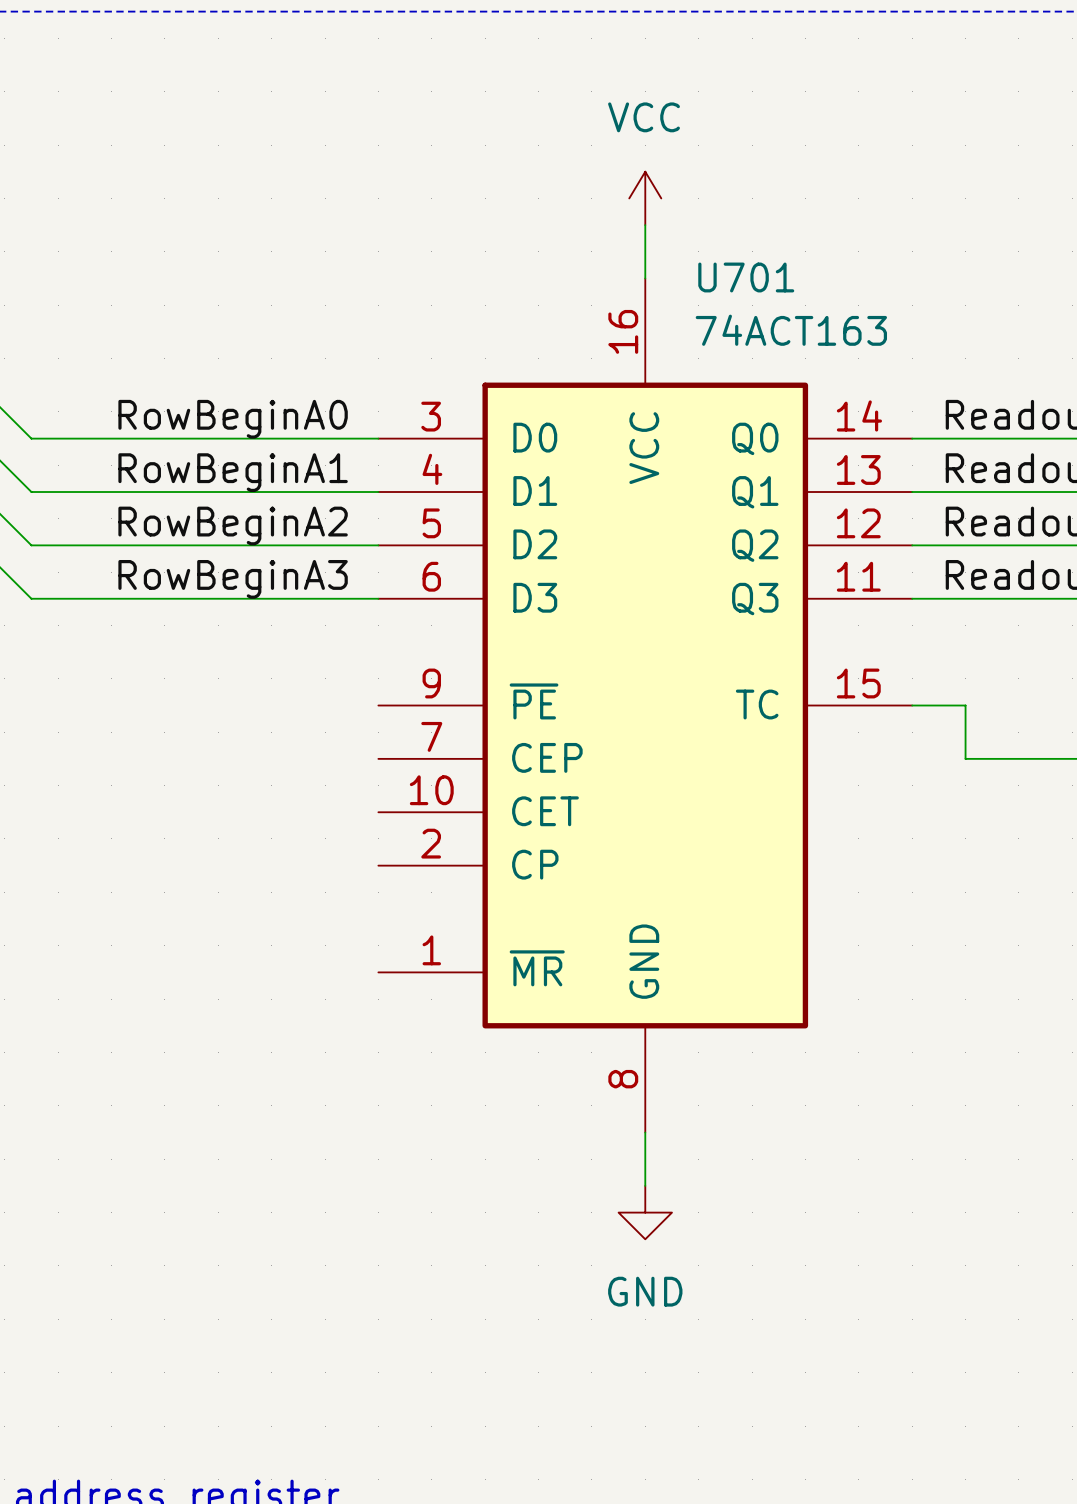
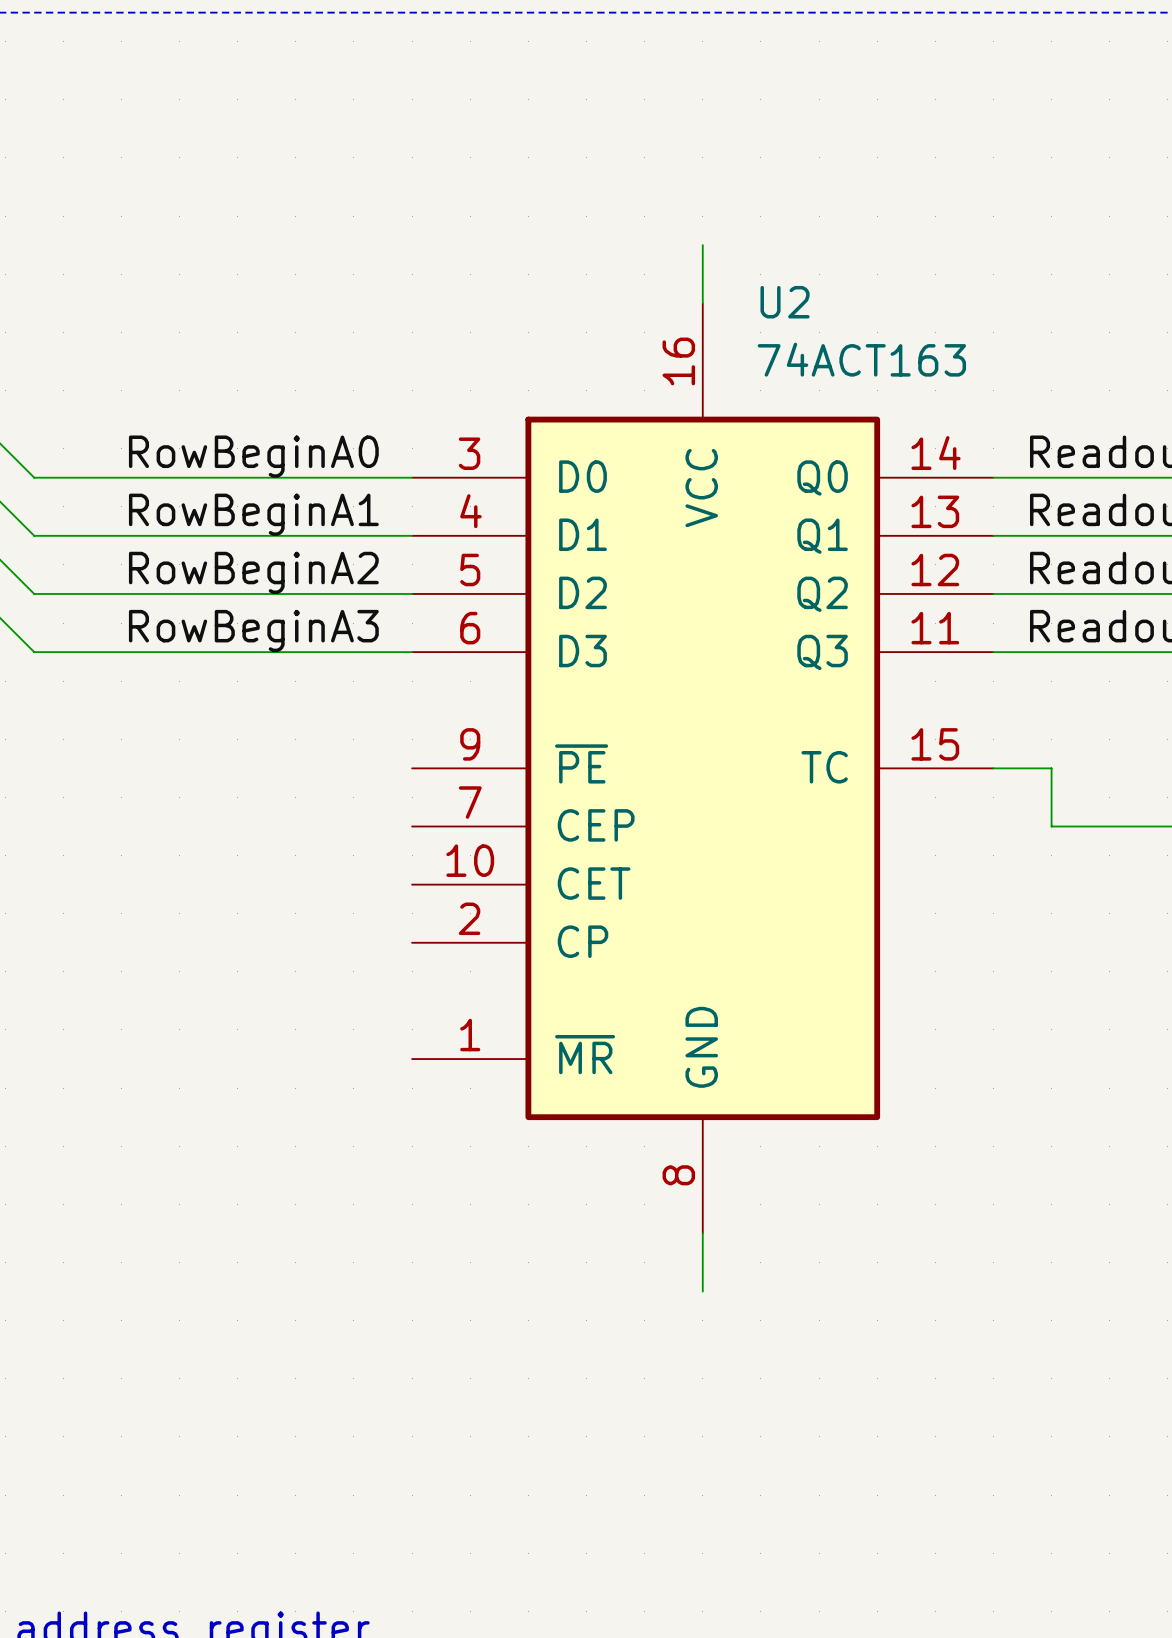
power symbol: VCC (645, 198) -> none
U701 name: U701 (746, 277) -> U2 (785, 302)
power symbol: GND (645, 1212) -> none

